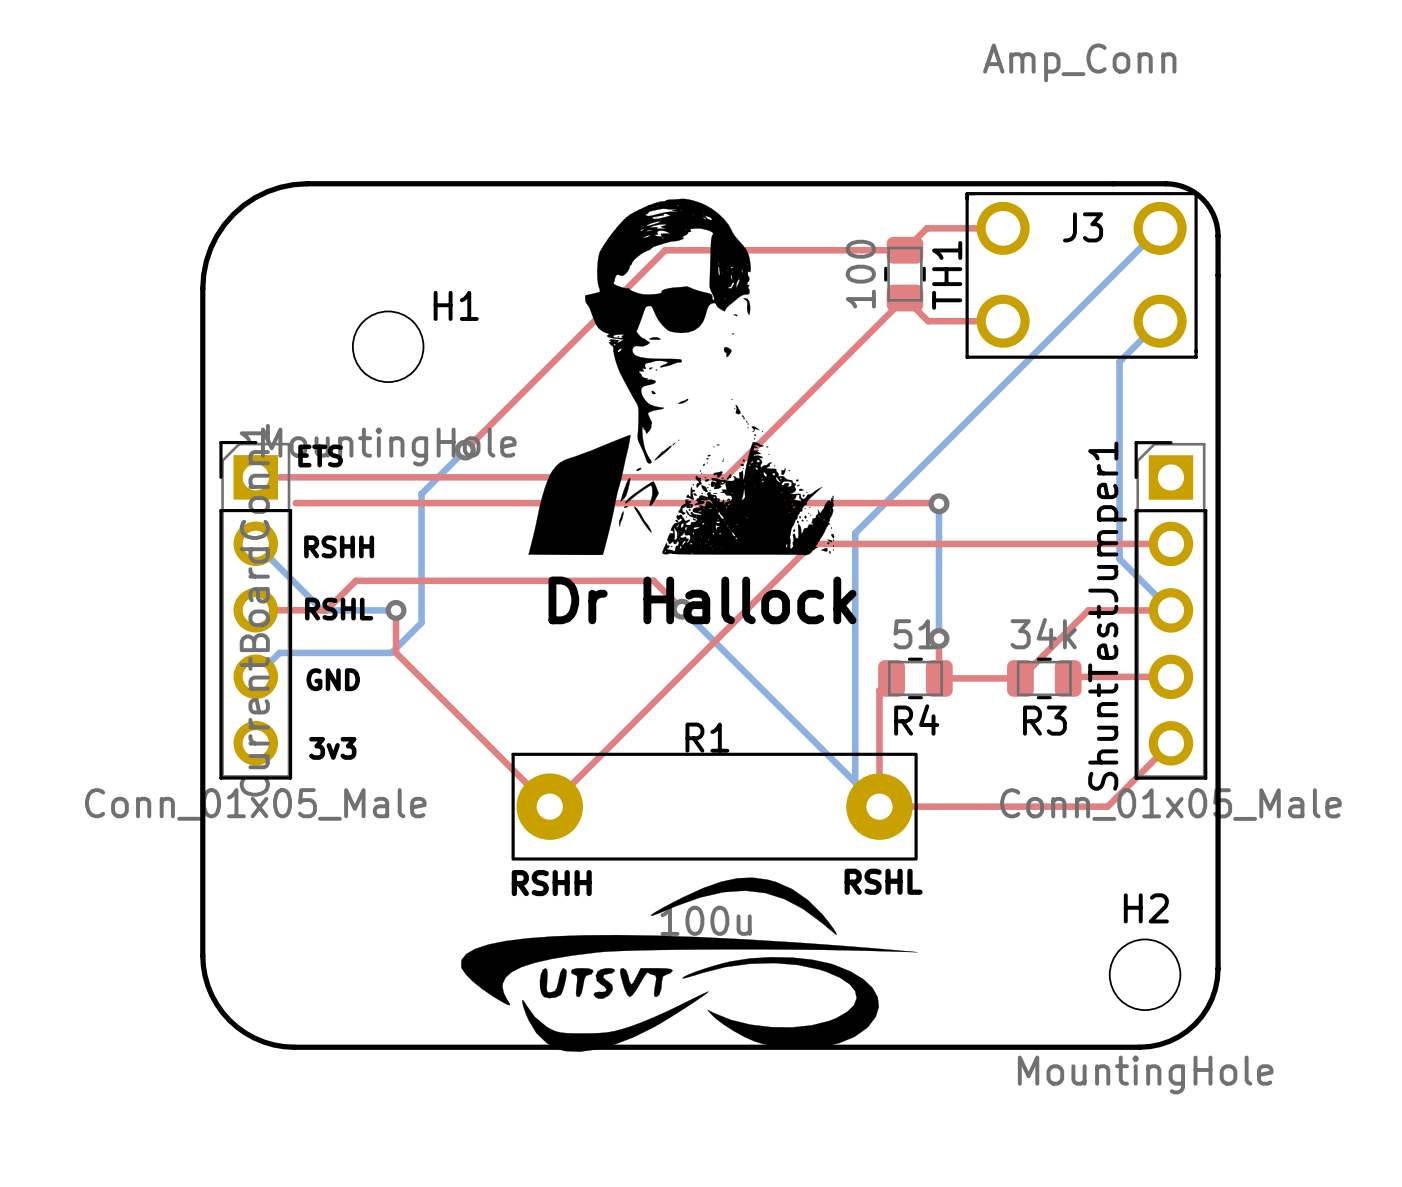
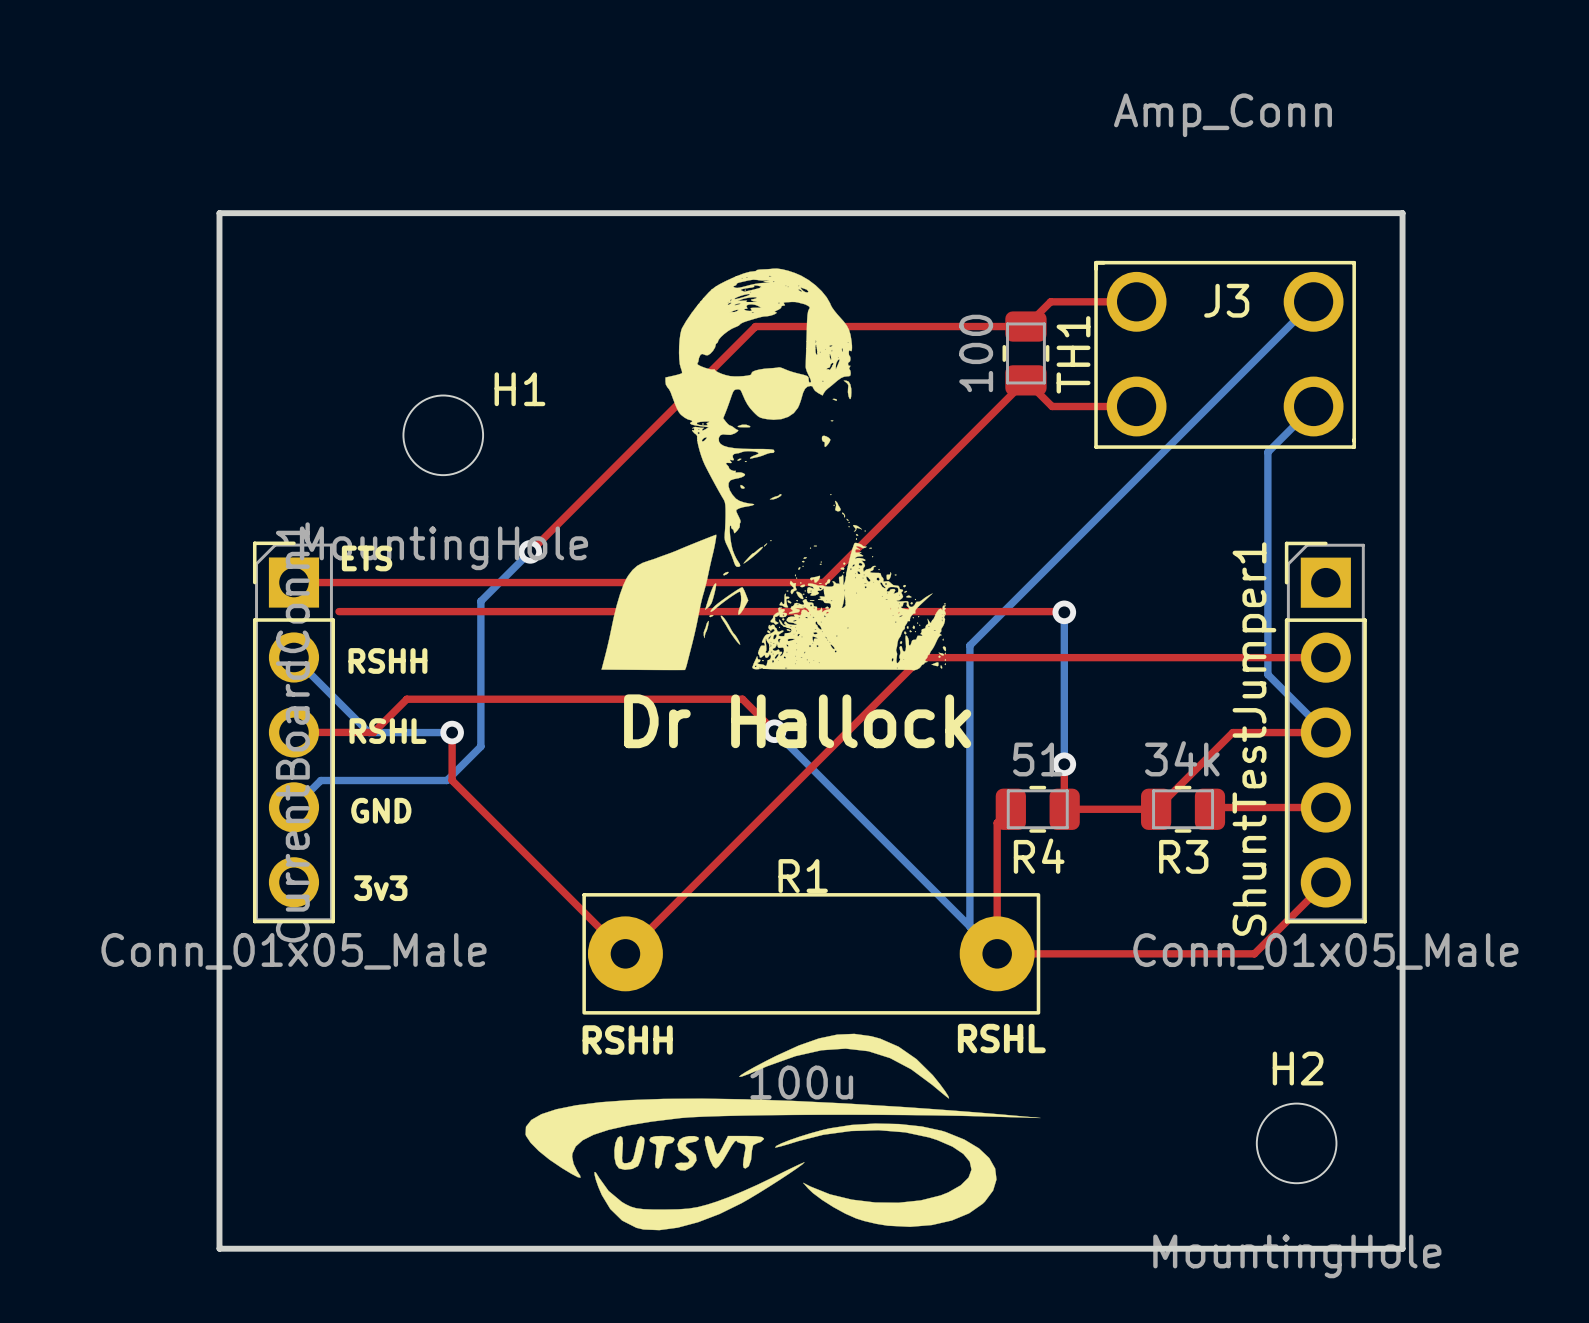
board edge: (307, 183) (1165, 183) (1183, 186) (1202, 199) (1215, 218) (1218, 236) (1218, 968) (1212, 998) (1195, 1024) (1169, 1041) (1139, 1047) (294, 1047) (264, 1042) (245, 1033) (229, 1020) (216, 1004) (207, 985) (202, 955) (203, 274) (206, 261) (216, 236) (233, 214) (255, 197) (267, 191) (293, 184) (307, 183) -> (219, 213) (219, 1248) (1402, 1248) (1402, 213) (219, 213)

